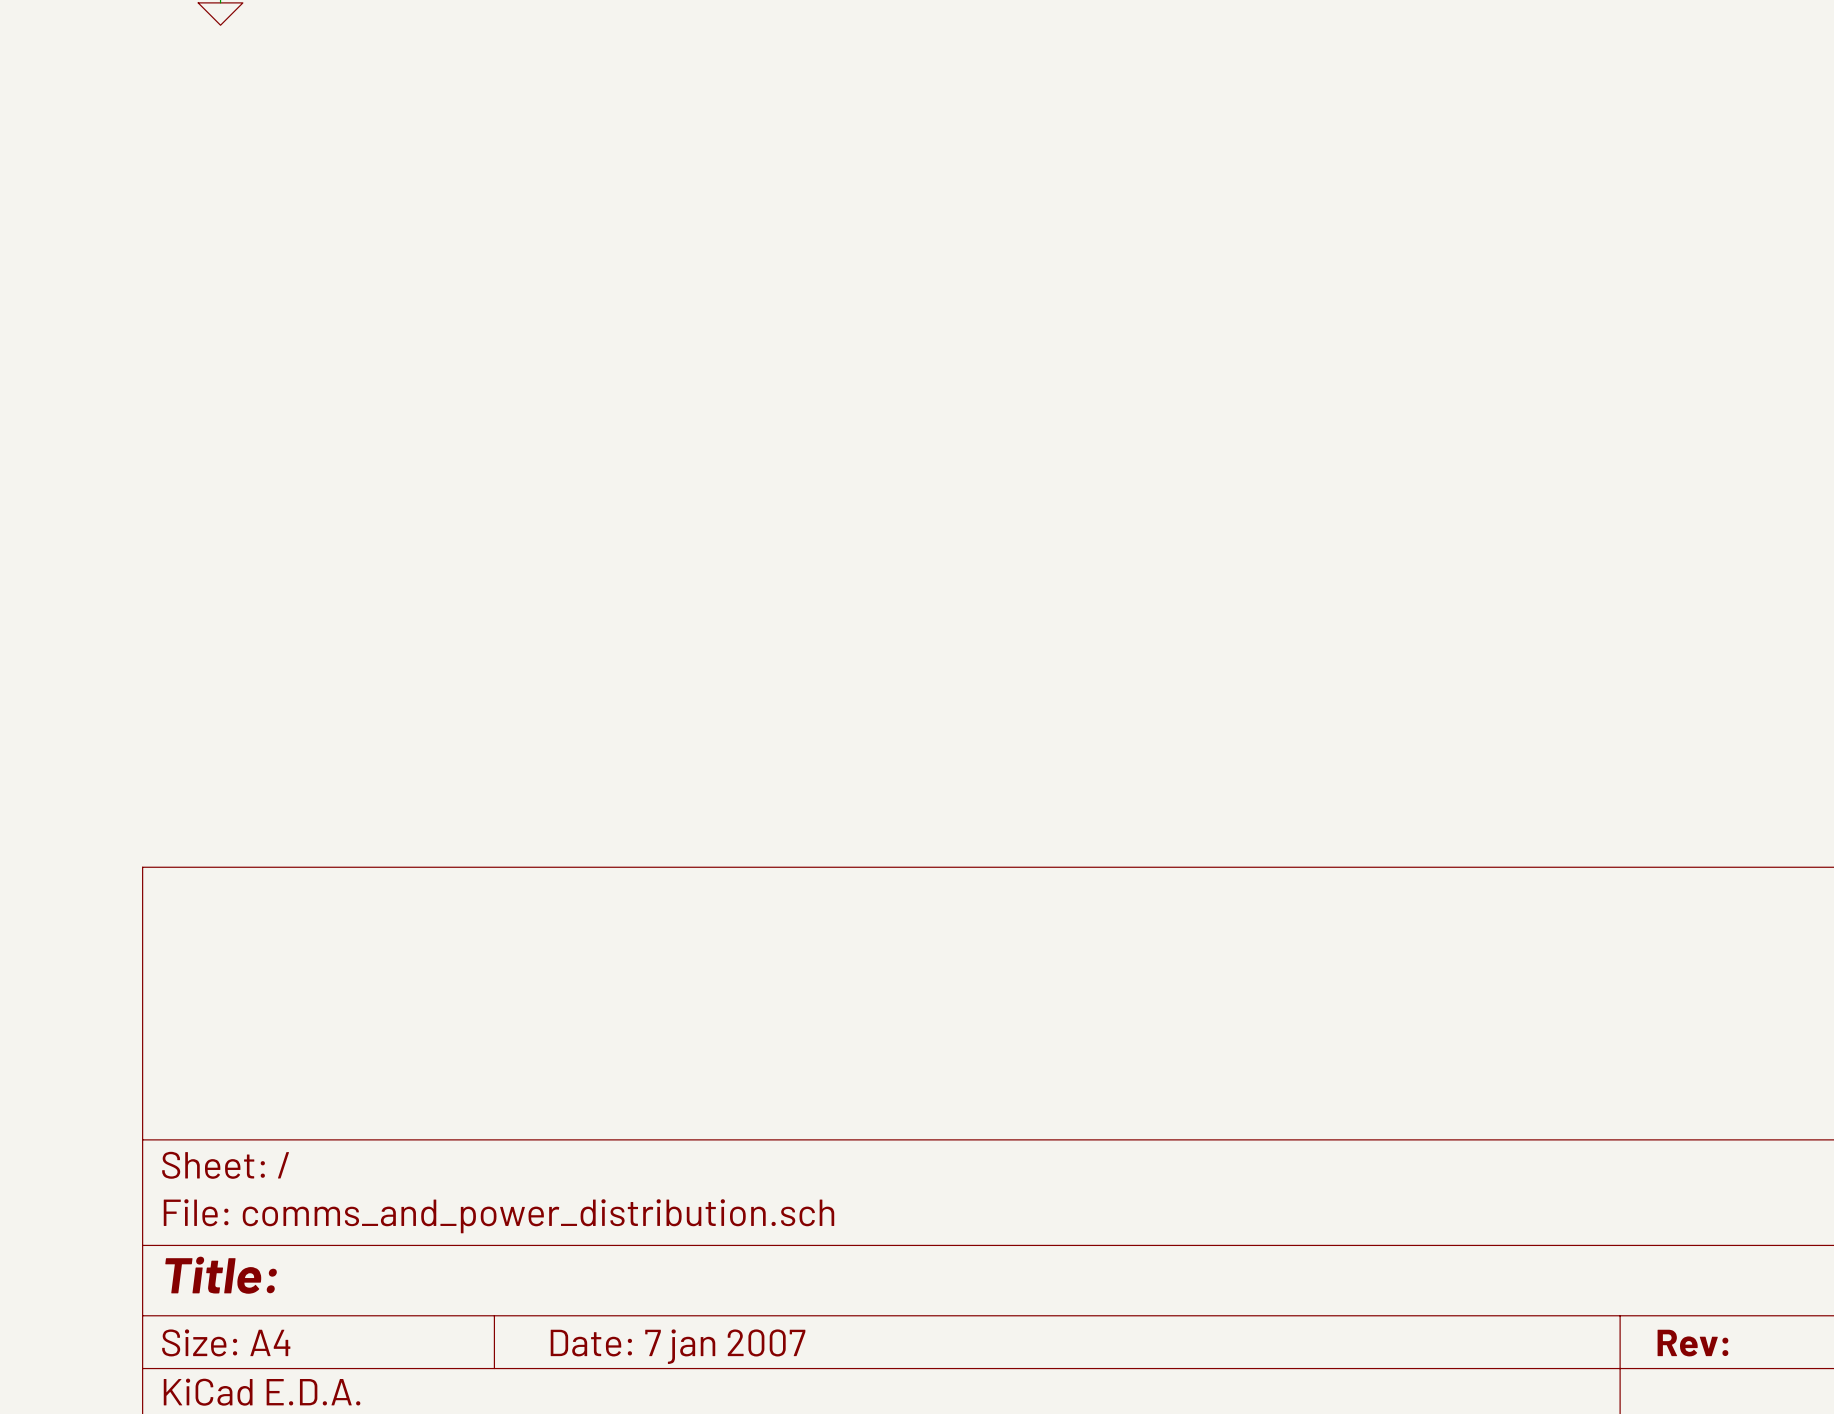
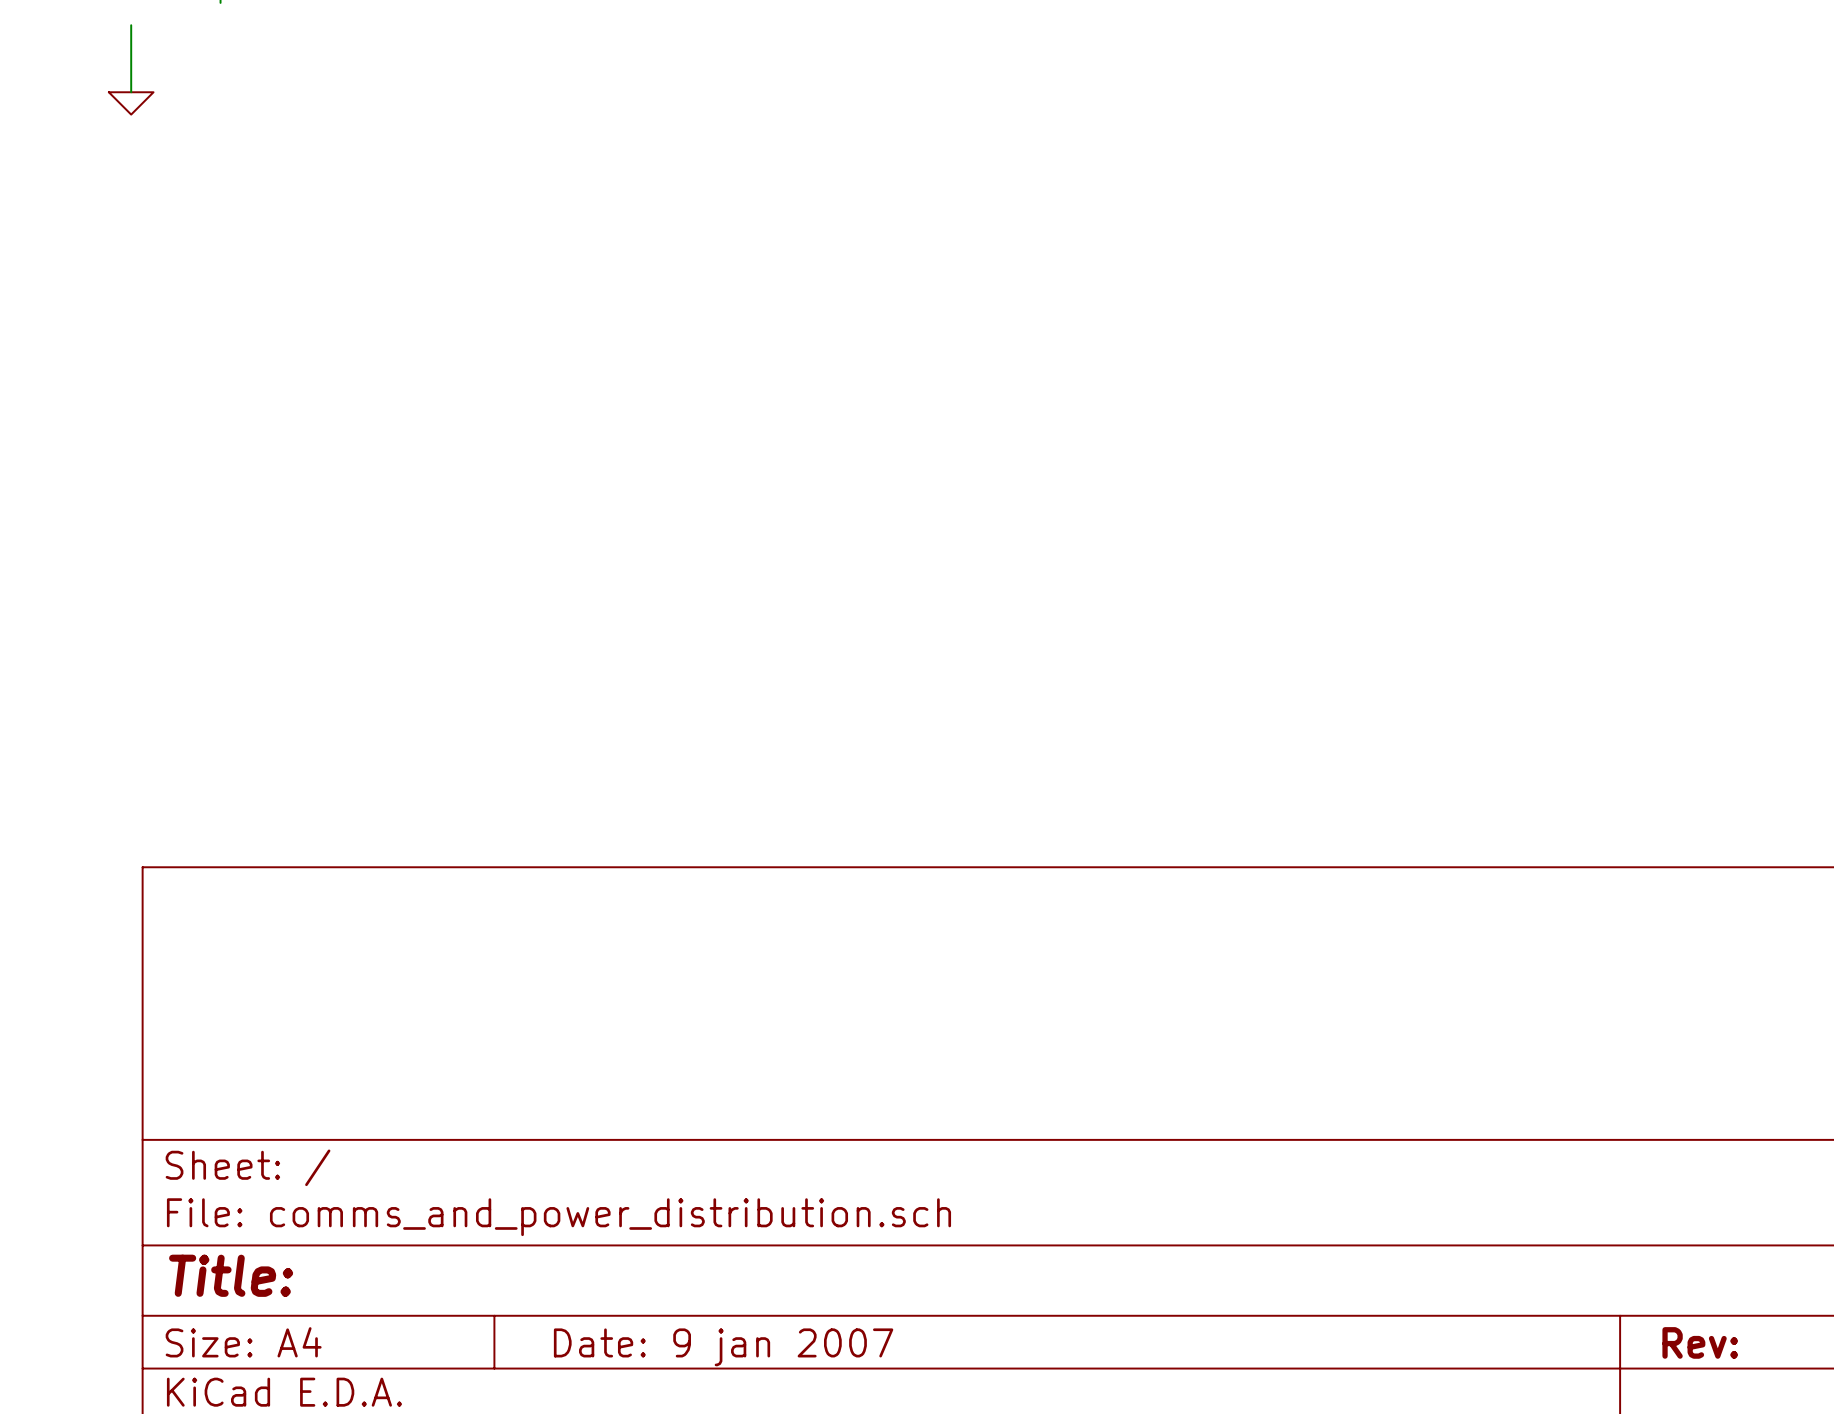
power symbol: (220, 14) -> none
wire: none -> (131, 25) (131, 92)
power symbol: none -> (131, 103)
title block: Date: 7 jan 2007 (678, 1346) -> Date: 9 jan 2007 (723, 1347)

